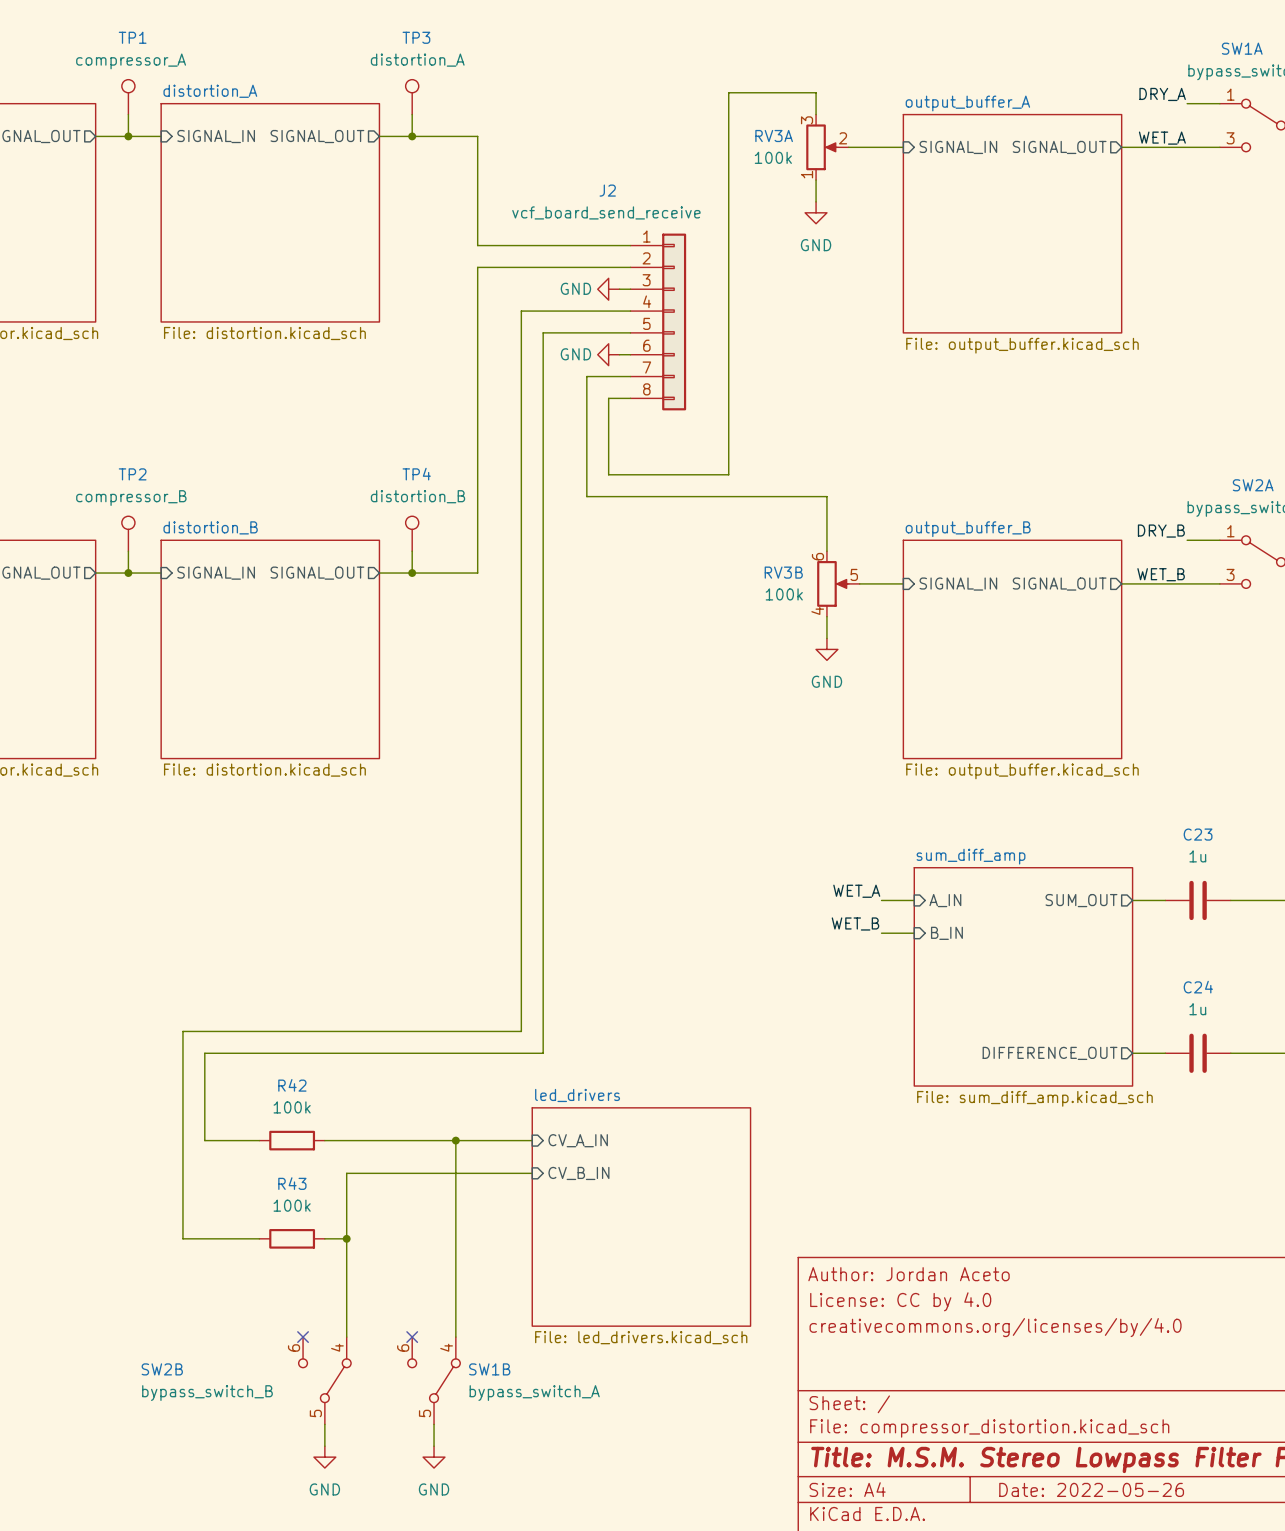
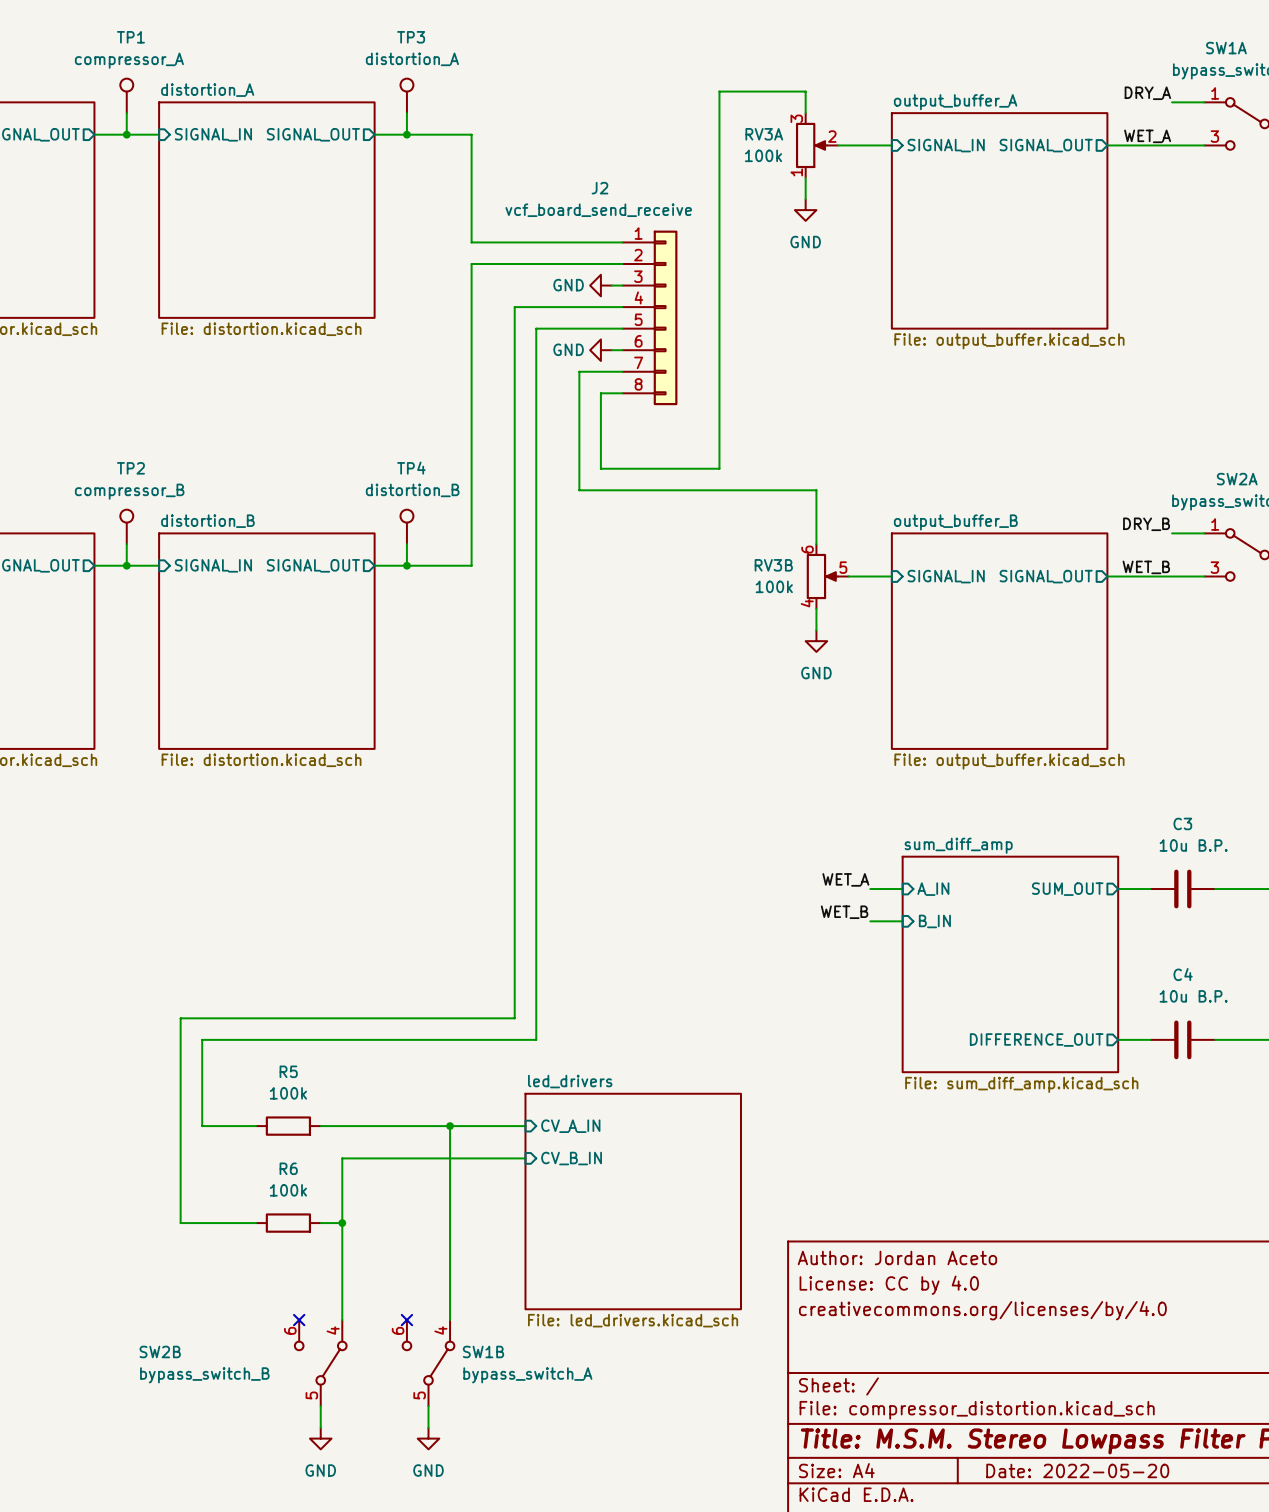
C23 name: C23 (1198, 834) -> C3 (1182, 823)
C23 value: 1u (1197, 856) -> 10u B.P. (1193, 845)
C24 name: C24 (1198, 987) -> C4 (1183, 974)
C24 value: 1u (1197, 1009) -> 10u B.P. (1193, 996)
R42 name: R42 (292, 1085) -> R5 (288, 1071)
R43 name: R43 (292, 1183) -> R6 (288, 1168)
title block: Date: 2022-05-26 (1091, 1489) -> Date: 2022-05-20 (1077, 1470)

